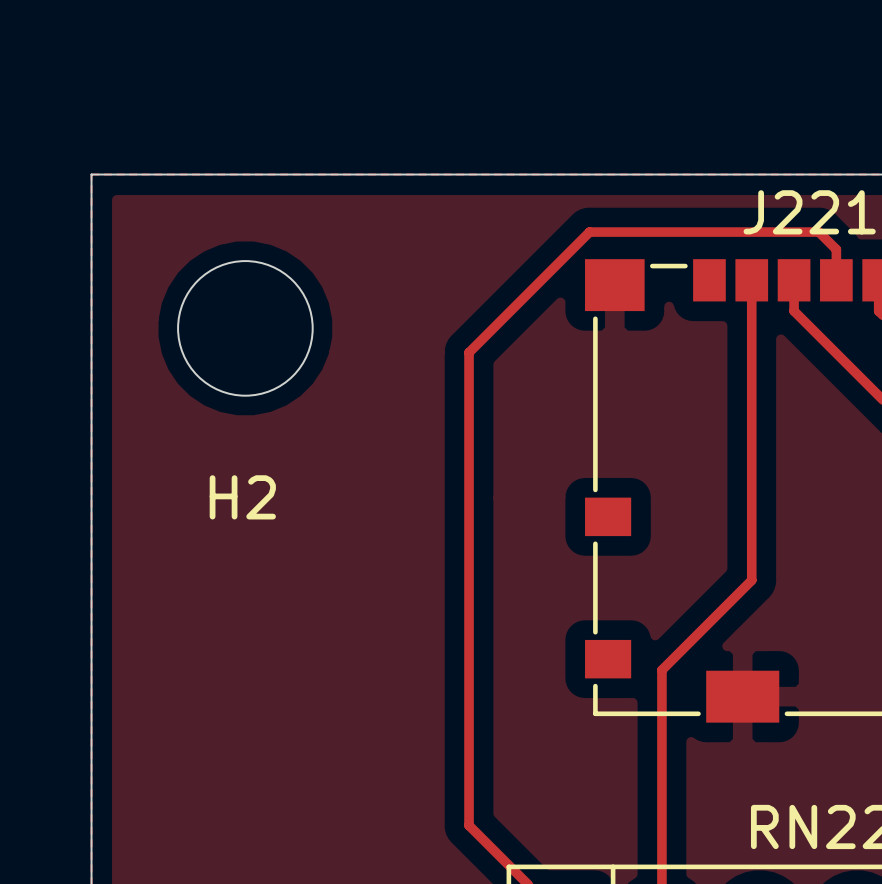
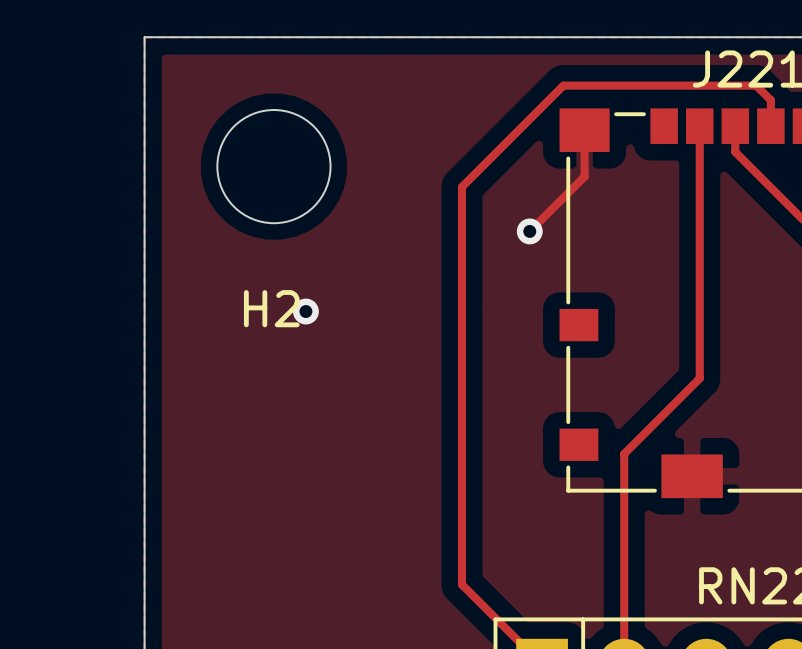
track: none -> (584, 130) (584, 176) (529, 231)
via: none -> (529, 231)
via: none -> (305, 311)

